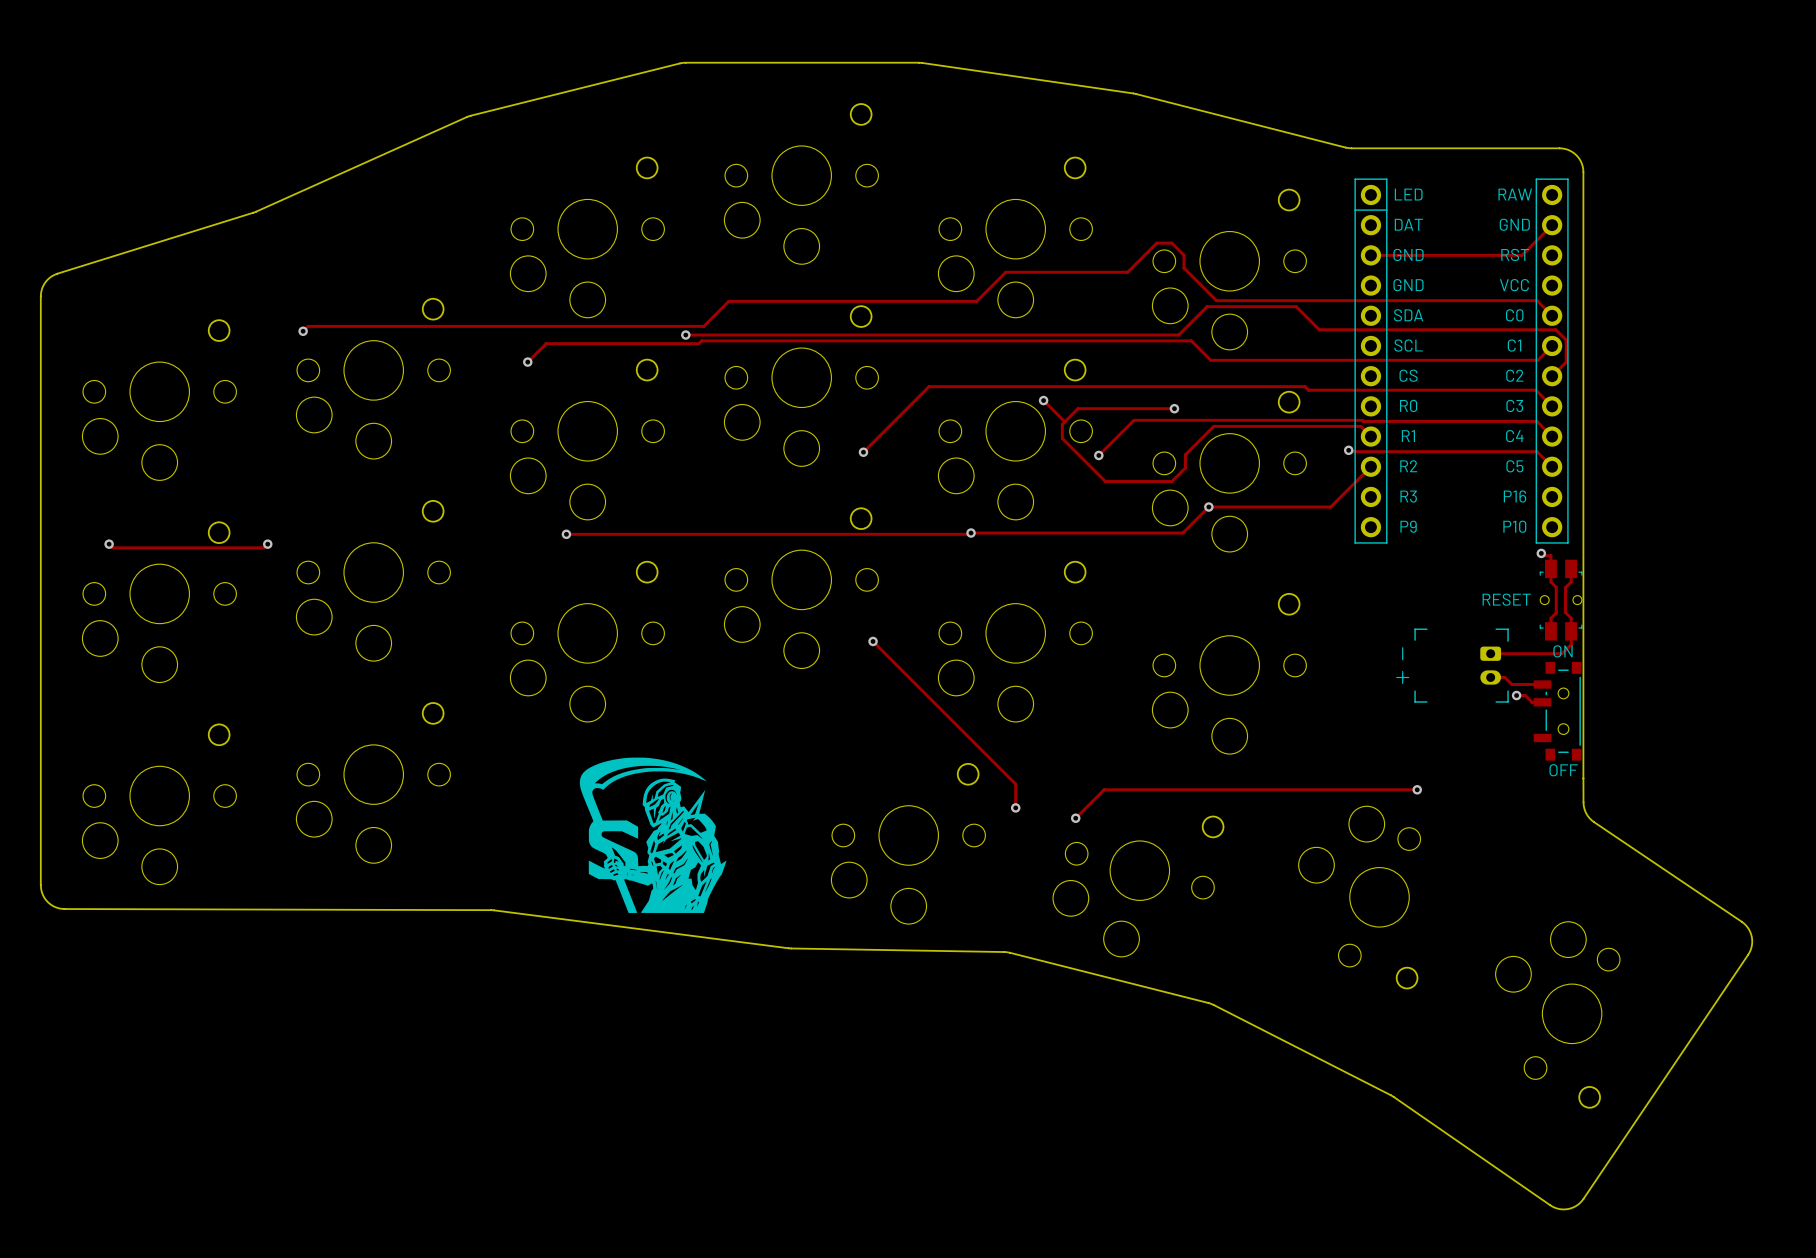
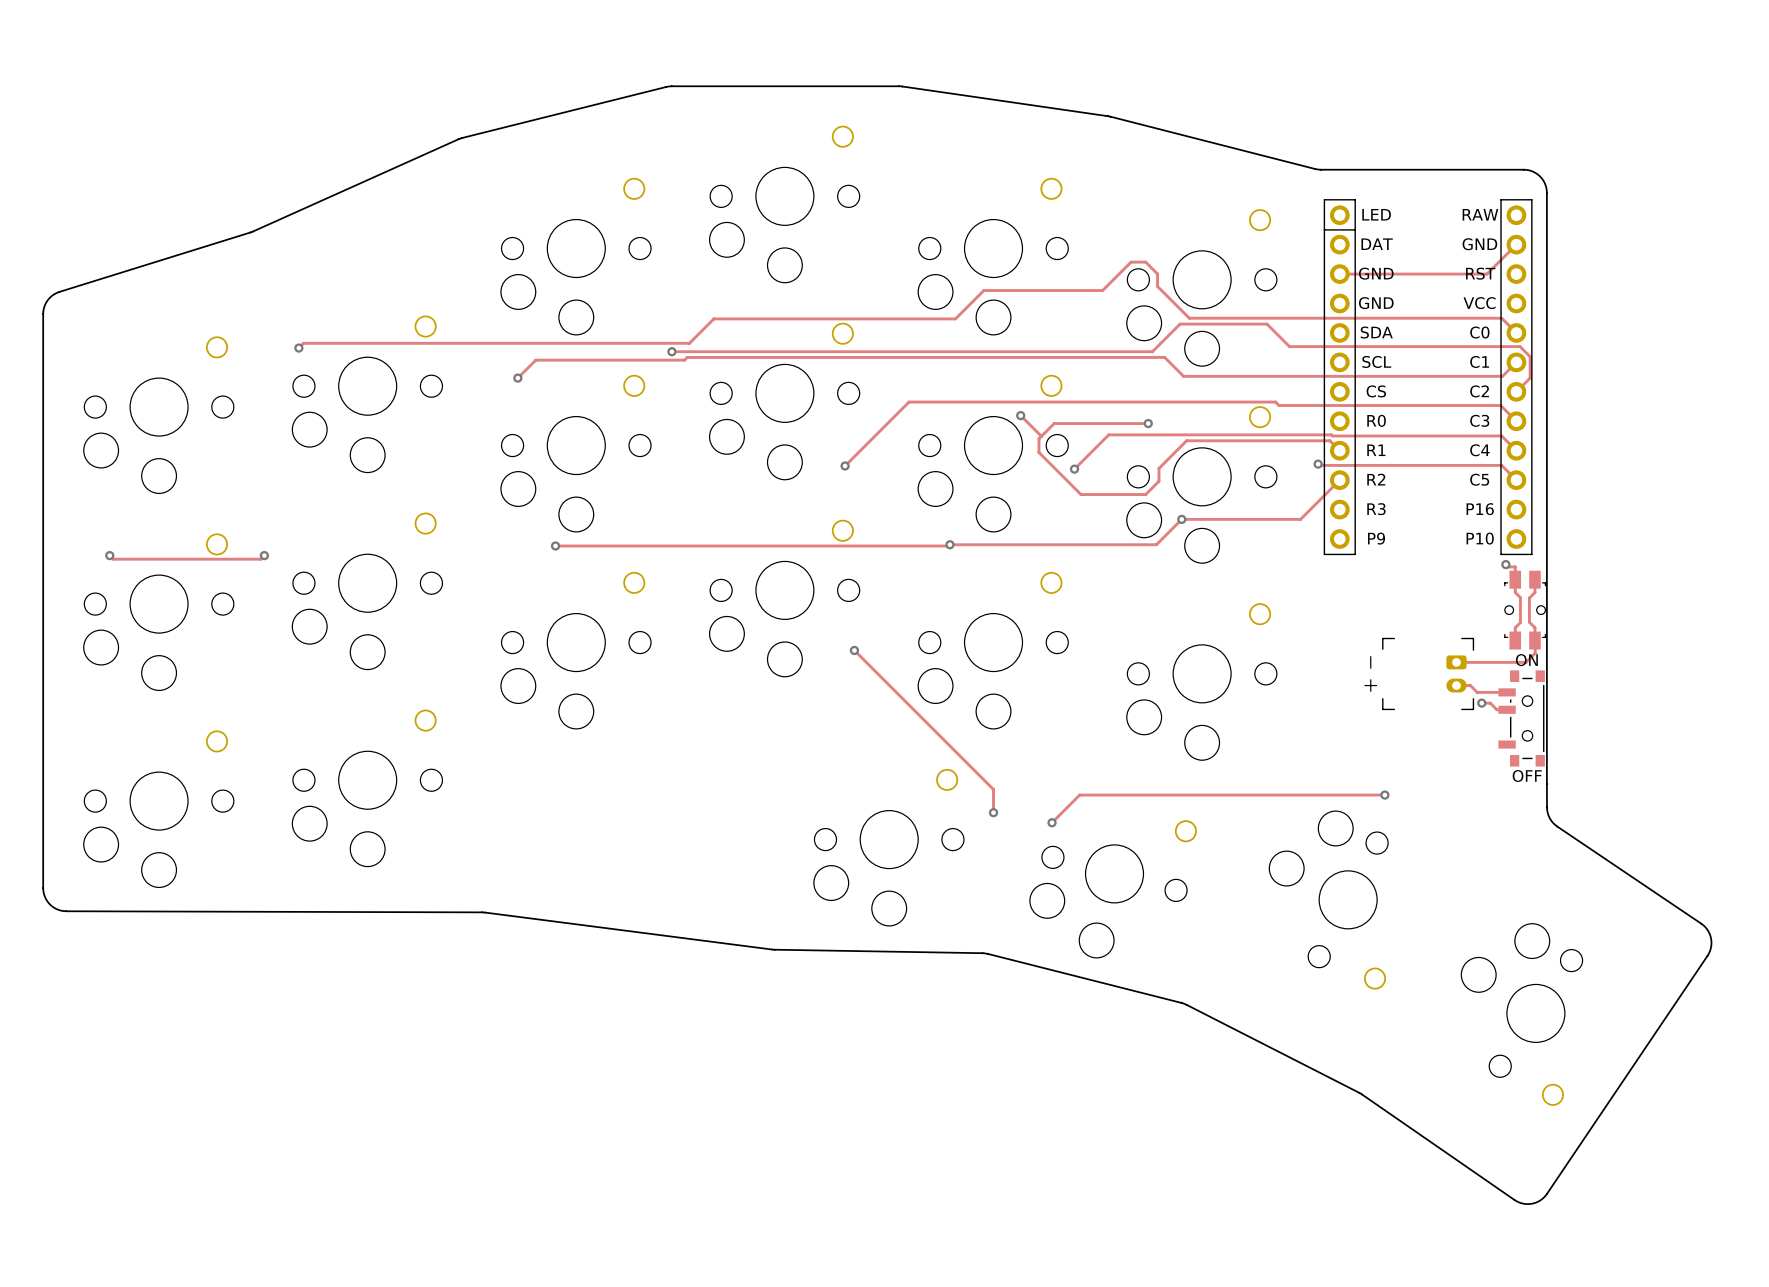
text: RESET (1506, 599) -> none
drawing: [579, 757, 727, 913] -> none

